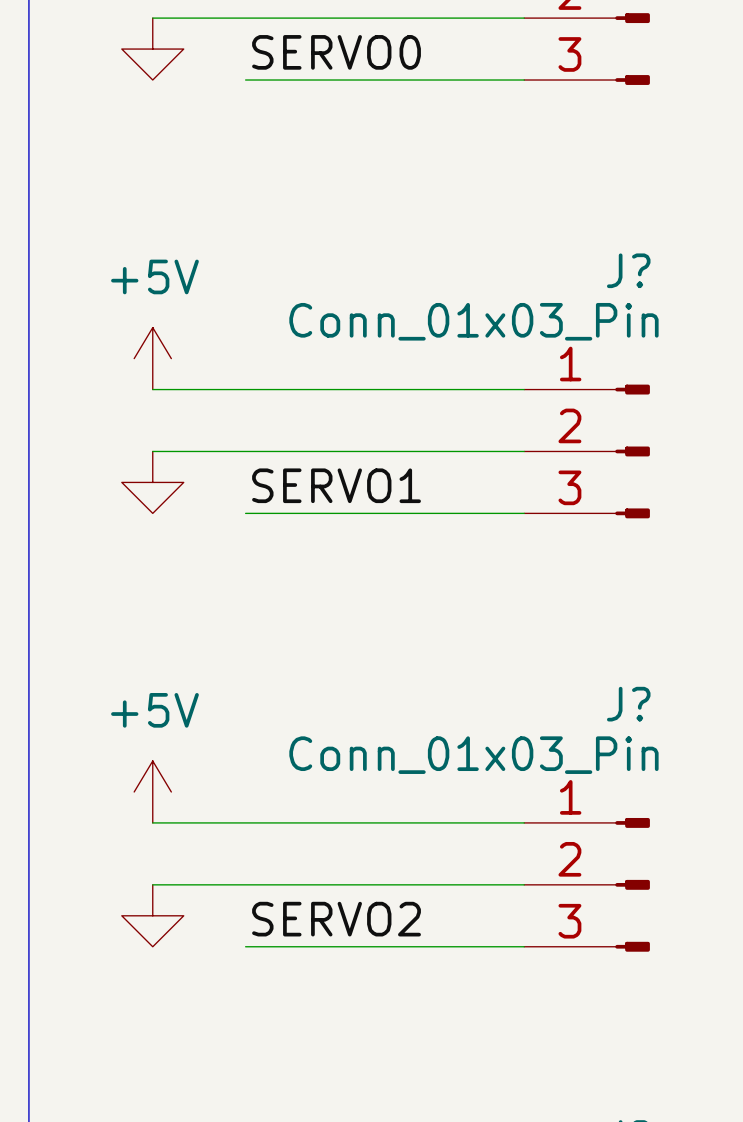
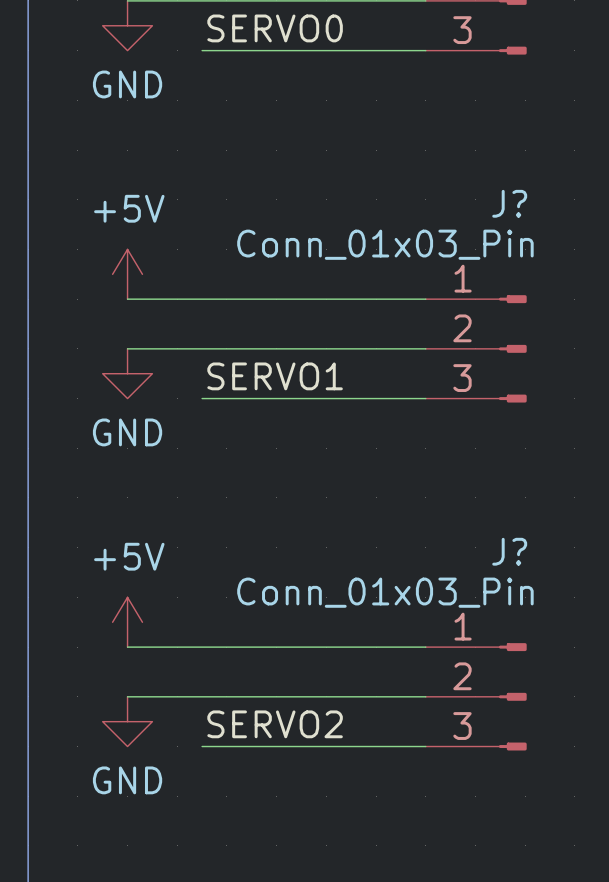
power symbol text: none -> GND (127, 84)
power symbol text: none -> GND (127, 432)
power symbol text: none -> GND (127, 780)

